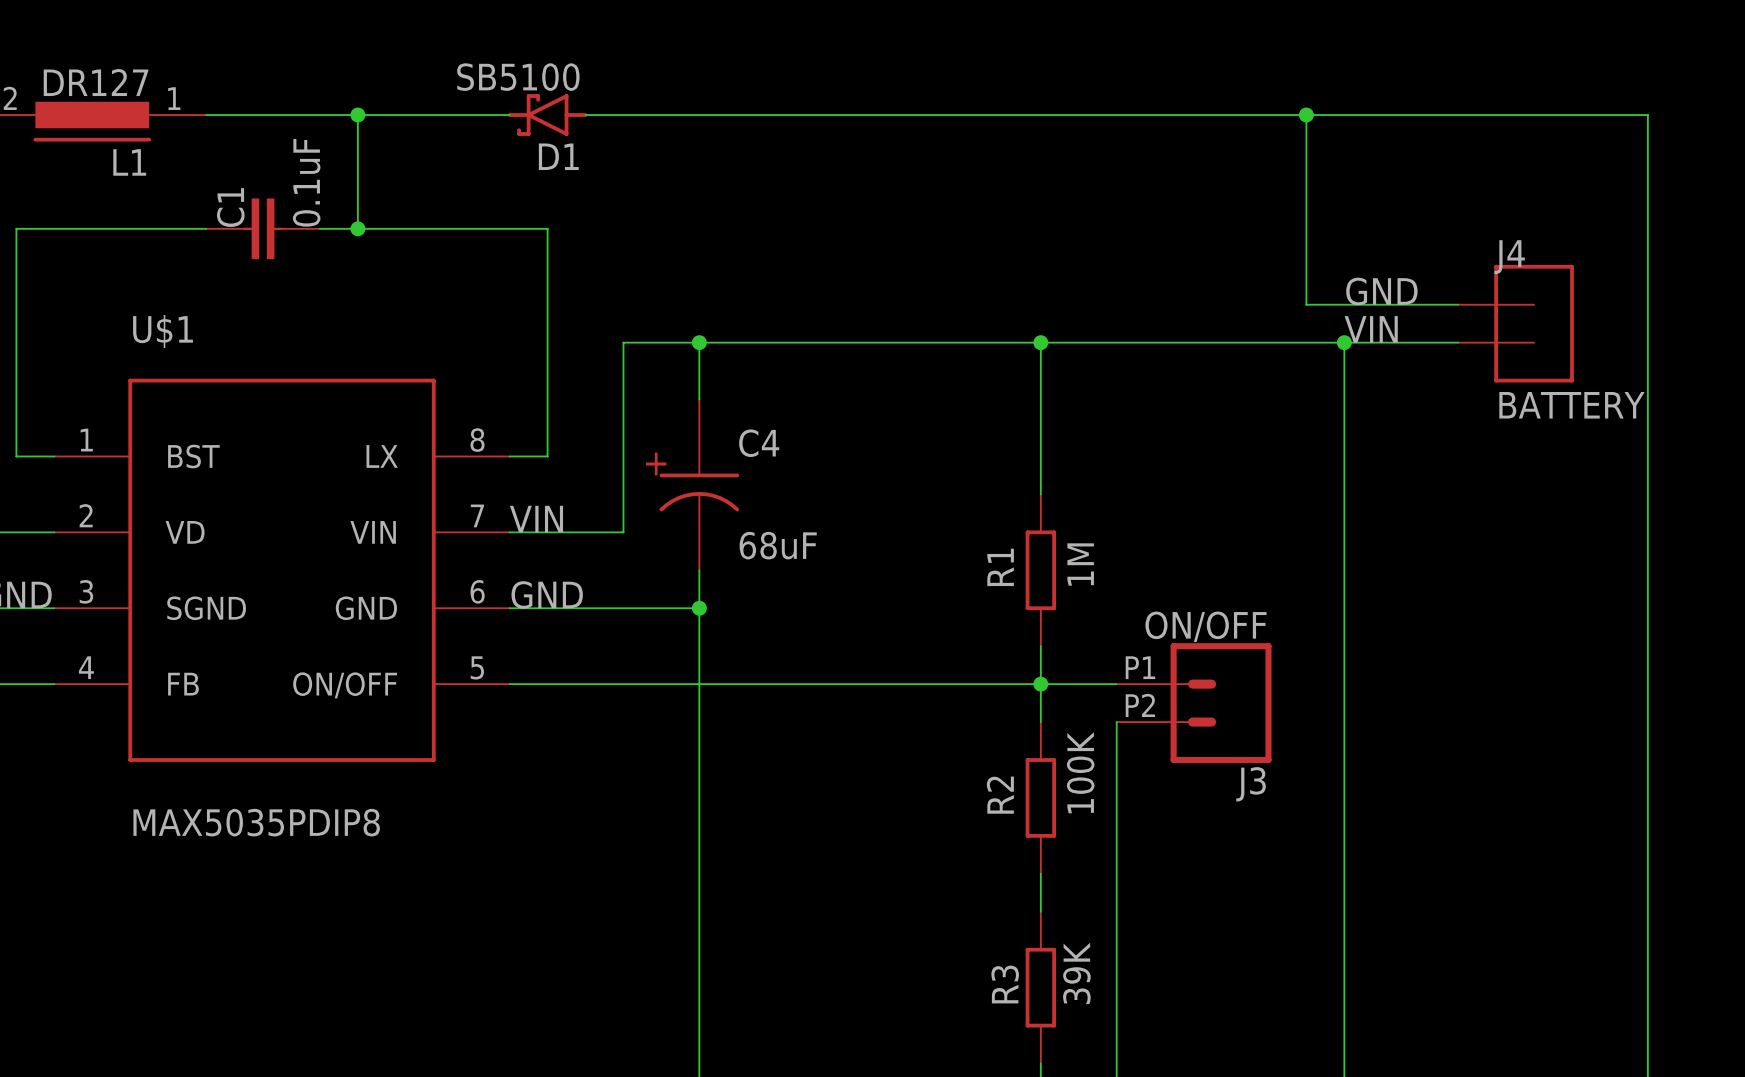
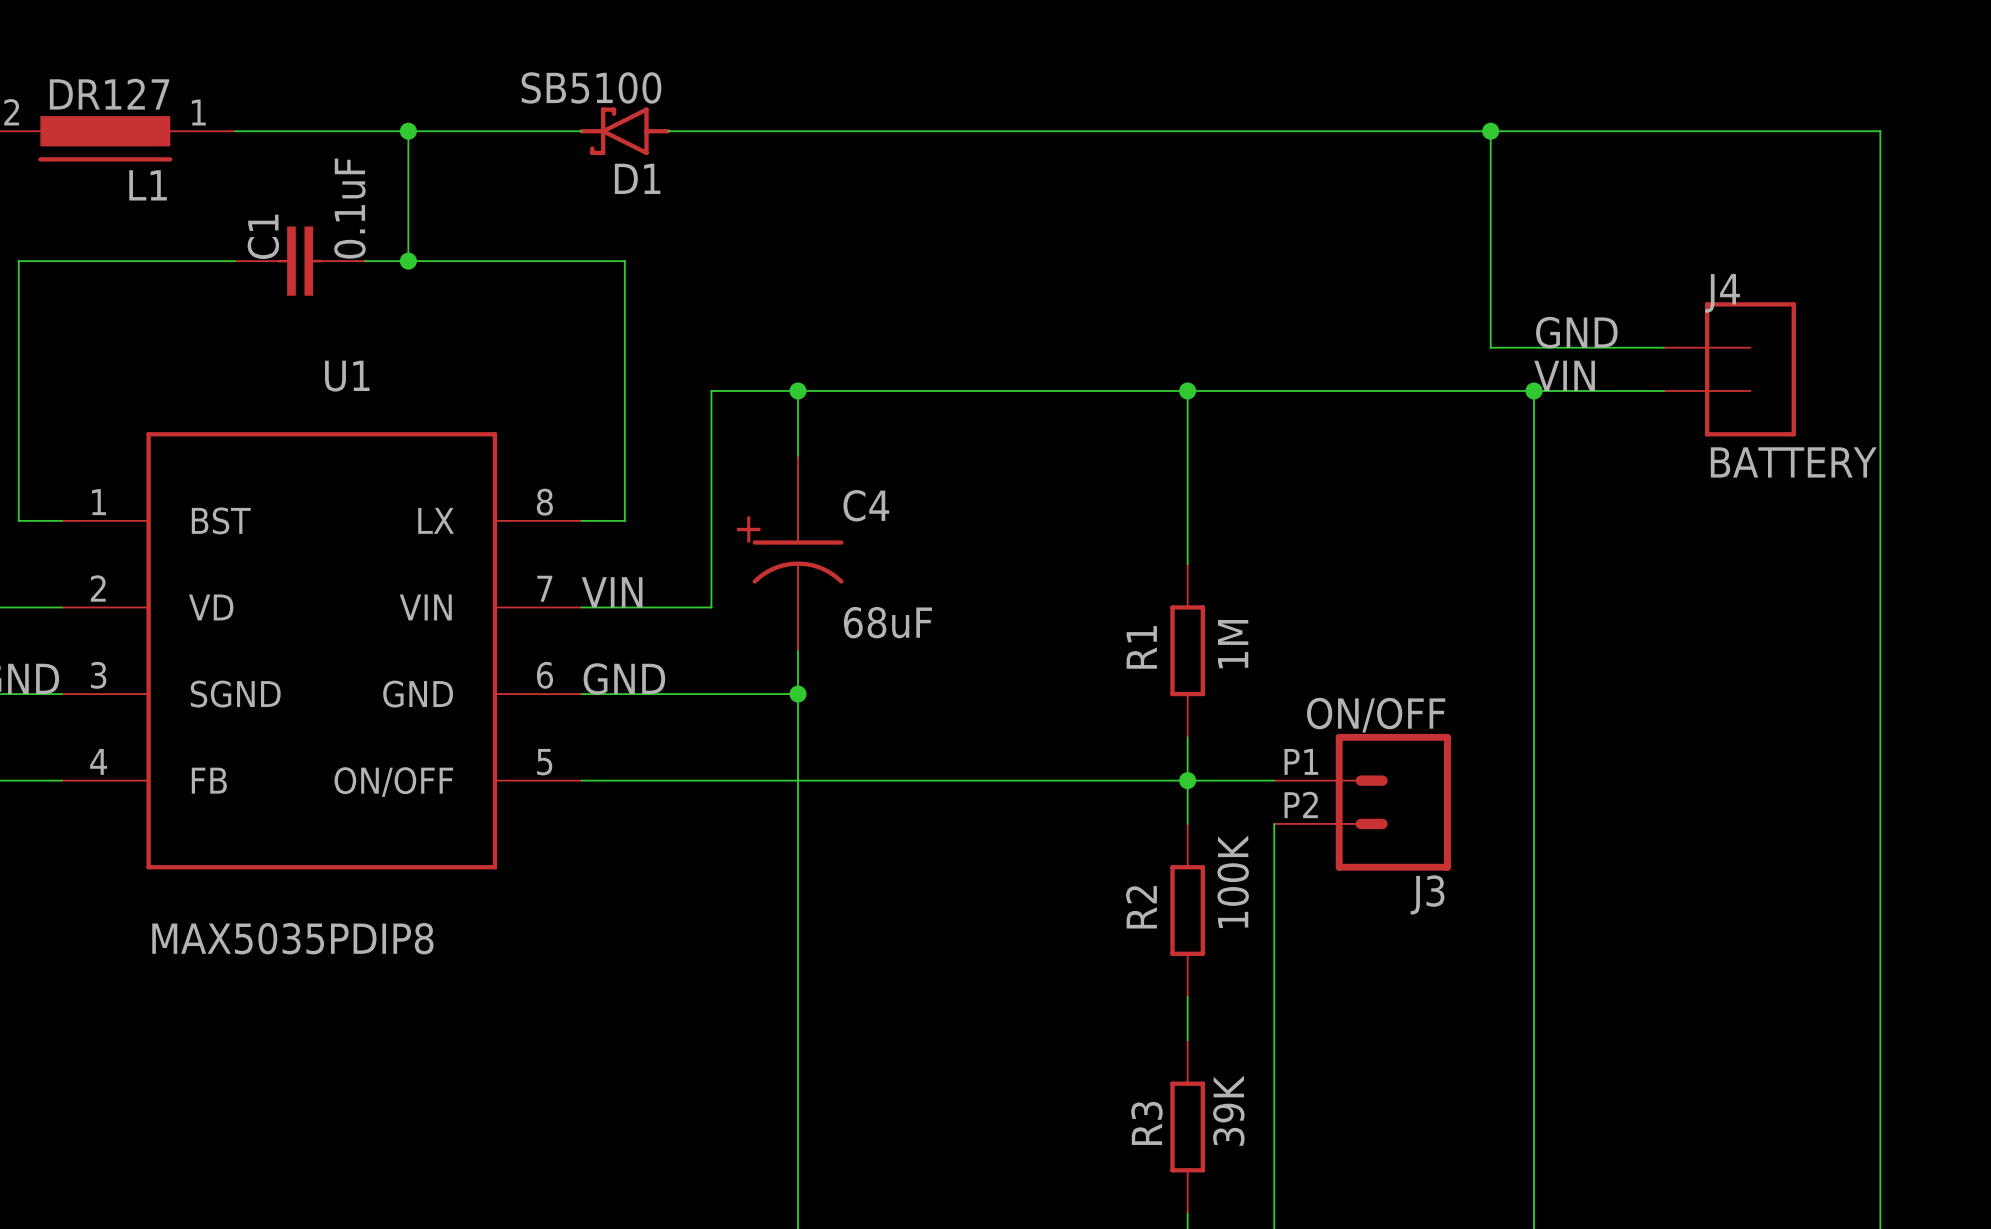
U$1 name: U$1 (163, 331) -> U1 (347, 376)

